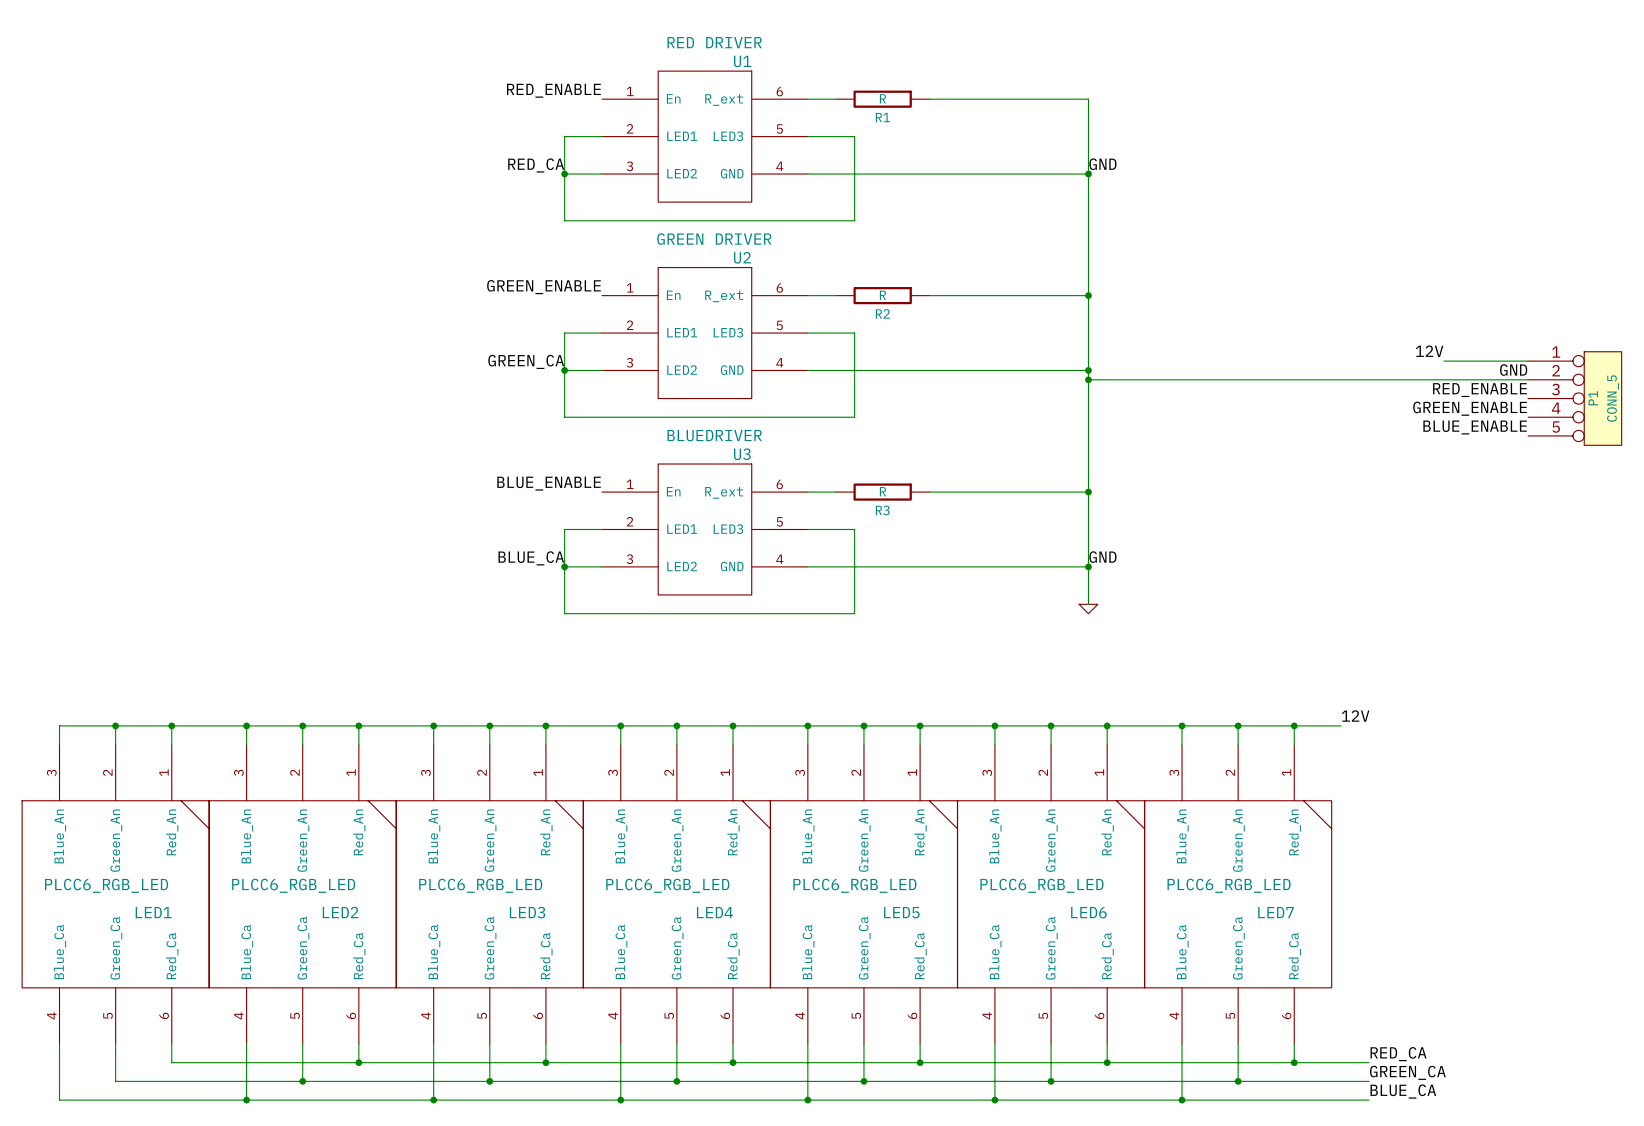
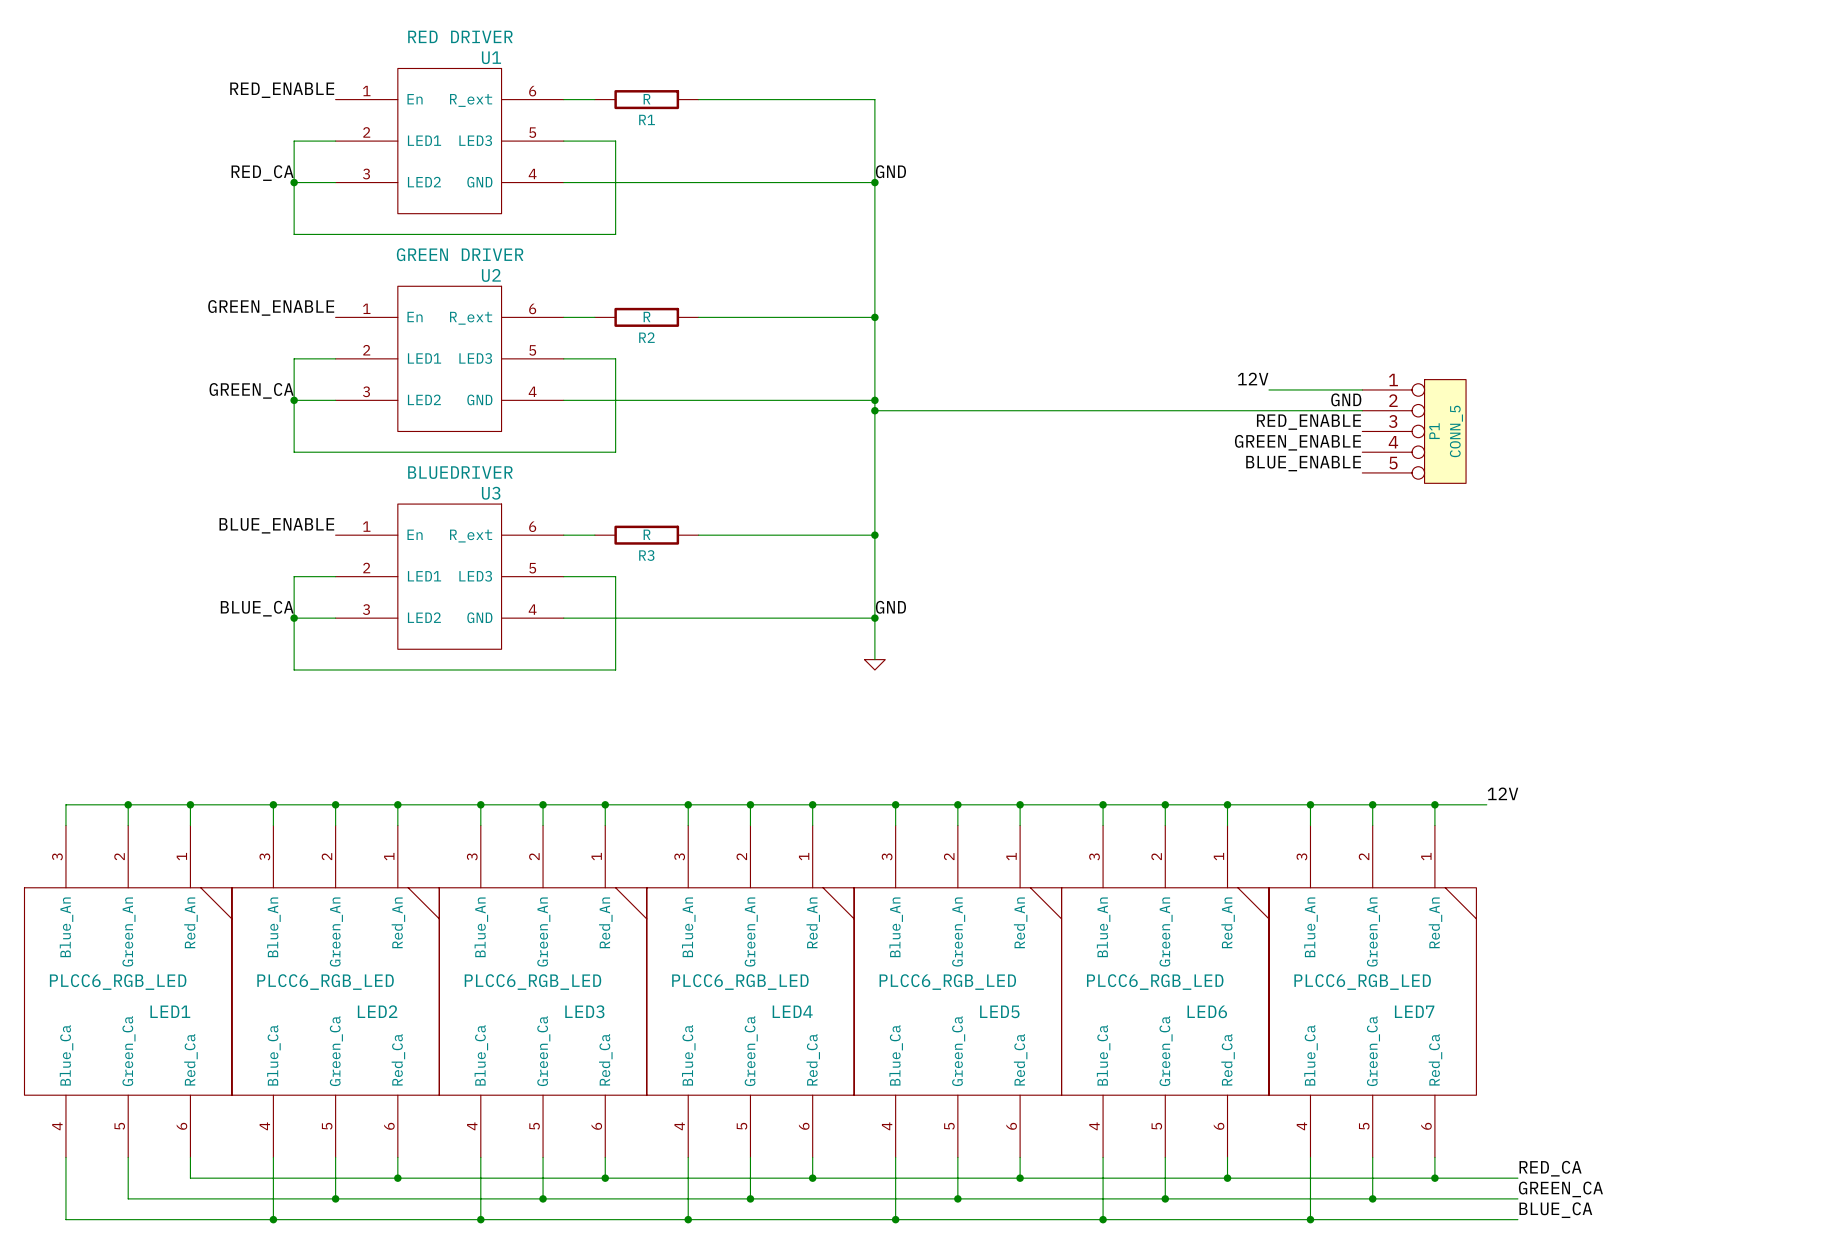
label: none -> RED_ENABLE (282, 90)
wire: none -> (563, 99) (594, 99)
wire: none -> (698, 99) (874, 99) (874, 659)
label: RED_ENABLE (553, 90) -> none
wire: (807, 99) (835, 99) -> none
R1 position: (882, 99) -> (646, 99)
wire: (929, 99) (1088, 99) (1088, 604) -> none
wire: none -> (335, 141) (294, 141) (294, 234) (615, 234) (615, 141) (563, 141)
wire: (602, 136) (564, 136) (564, 220) (854, 220) (854, 136) (807, 136) -> none
U1 position: (704, 136) -> (449, 141)
label: none -> GND (890, 171)
label: none -> RED_CA (262, 173)
wire: none -> (294, 182) (335, 182)
junction: none -> (294, 182)
wire: none -> (563, 182) (874, 182)
junction: none -> (874, 182)
label: GND (1102, 164) -> none
label: RED_CA (536, 165) -> none
wire: (564, 174) (602, 174) -> none
junction: (564, 174) -> none
wire: (807, 174) (1088, 174) -> none
junction: (1088, 174) -> none
label: none -> GREEN_ENABLE (271, 307)
wire: none -> (563, 317) (594, 317)
wire: none -> (698, 317) (874, 317)
junction: none -> (874, 317)
label: GREEN_ENABLE (543, 287) -> none
wire: (807, 295) (835, 295) -> none
R2 position: (882, 295) -> (646, 317)
wire: (929, 295) (1088, 295) -> none
junction: (1088, 295) -> none
wire: none -> (335, 358) (294, 358) (294, 452) (615, 452) (615, 358) (563, 358)
wire: (602, 333) (564, 333) (564, 417) (854, 417) (854, 333) (807, 333) -> none
U2 position: (704, 333) -> (449, 358)
label: none -> 12V (1253, 379)
wire: none -> (1268, 389) (1362, 389)
label: 12V (1429, 351) -> none
label: none -> GREEN_CA (251, 390)
label: none -> GND (1346, 399)
wire: none -> (294, 400) (335, 400)
junction: none -> (294, 400)
wire: none -> (563, 400) (874, 400)
label: GREEN_CA (526, 361) -> none
junction: none -> (874, 400)
wire: (1443, 361) (1528, 361) -> none
wire: (564, 370) (602, 370) -> none
junction: (564, 370) -> none
junction: none -> (874, 410)
wire: none -> (1206, 410) (1362, 410)
junction: (1088, 370) -> none
label: GND (1513, 370) -> none
wire: (1088, 379) (1528, 379) -> none
junction: (1088, 379) -> none
label: none -> RED_ENABLE (1308, 422)
label: RED_ENABLE (1479, 390) -> none
P1 position: (1574, 398) -> (1414, 431)
label: none -> GREEN_ENABLE (1297, 442)
label: GREEN_ENABLE (1470, 408) -> none
label: none -> BLUE_ENABLE (1303, 463)
label: BLUE_ENABLE (1475, 427) -> none
label: none -> BLUE_ENABLE (276, 525)
wire: none -> (563, 535) (594, 535)
wire: none -> (698, 535) (874, 535)
junction: none -> (874, 535)
label: BLUE_ENABLE (549, 483) -> none
wire: (807, 492) (835, 492) -> none
R3 position: (882, 492) -> (646, 535)
wire: (929, 492) (1088, 492) -> none
junction: (1088, 492) -> none
wire: none -> (335, 576) (294, 576) (294, 669) (615, 669) (615, 576) (563, 576)
wire: (602, 529) (564, 529) (564, 613) (854, 613) (854, 529) (807, 529) -> none
U3 position: (704, 529) -> (449, 576)
label: none -> GND (890, 607)
label: none -> BLUE_CA (257, 608)
wire: none -> (294, 618) (335, 618)
junction: none -> (294, 618)
wire: none -> (563, 618) (874, 618)
junction: none -> (874, 618)
label: GND (1102, 557) -> none
label: BLUE_CA (531, 558) -> none
wire: (564, 566) (602, 566) -> none
junction: (564, 566) -> none
wire: (807, 566) (1088, 566) -> none
junction: (1088, 566) -> none
power symbol: none -> (874, 664)
power symbol: (1088, 608) -> none

